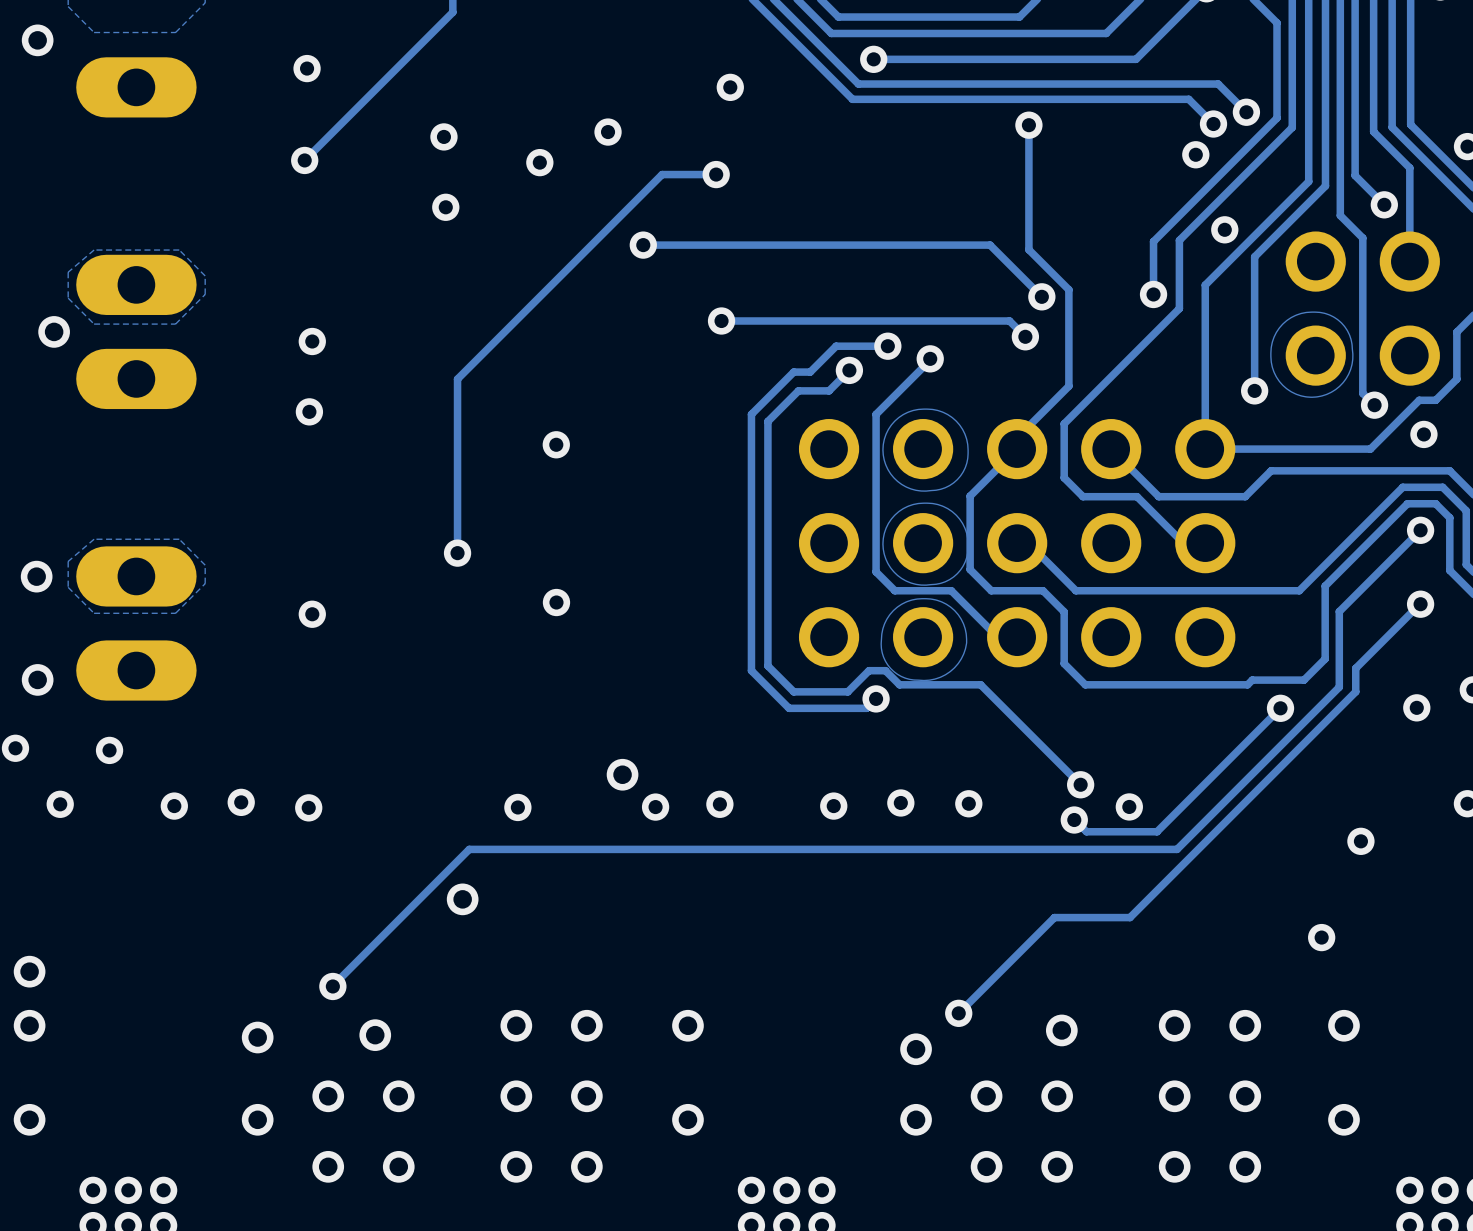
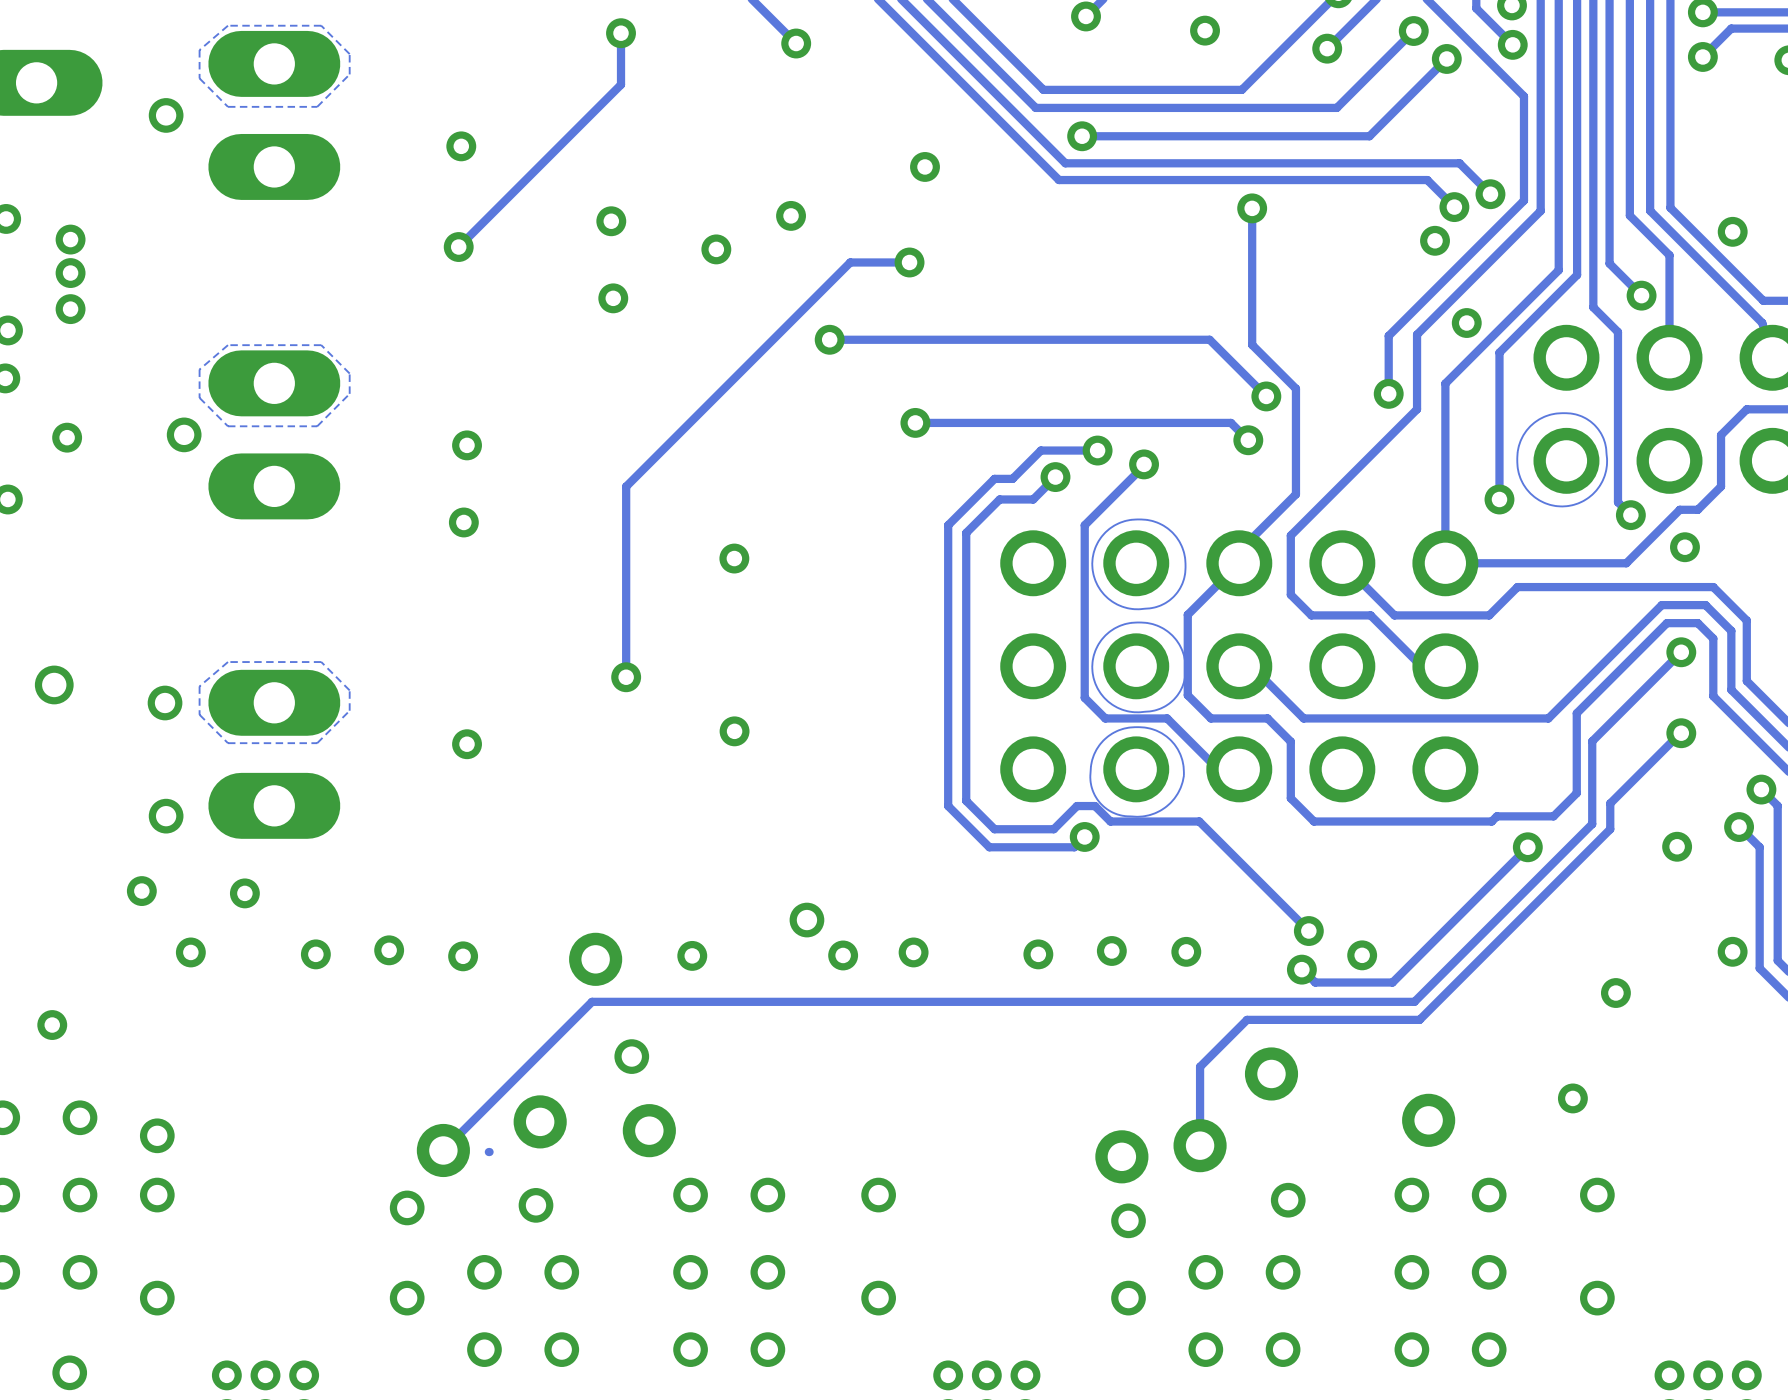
part: none -> (595, 959)
track: (469, 849) (332, 986) -> (639, 1001) (592, 1001) (443, 1150)
track: (1181, 865) (1130, 917) (1054, 917) (958, 1013) -> (1419, 1019) (1247, 1019) (1200, 1066) (1200, 1145)
part: none -> (1271, 1073)
part: none -> (1428, 1120)
part: none -> (540, 1121)
part: none -> (649, 1130)
part: none -> (1200, 1145)
part: none -> (443, 1150)
via: (332, 986) -> none
part: none -> (1121, 1156)
via: (958, 1013) -> none

